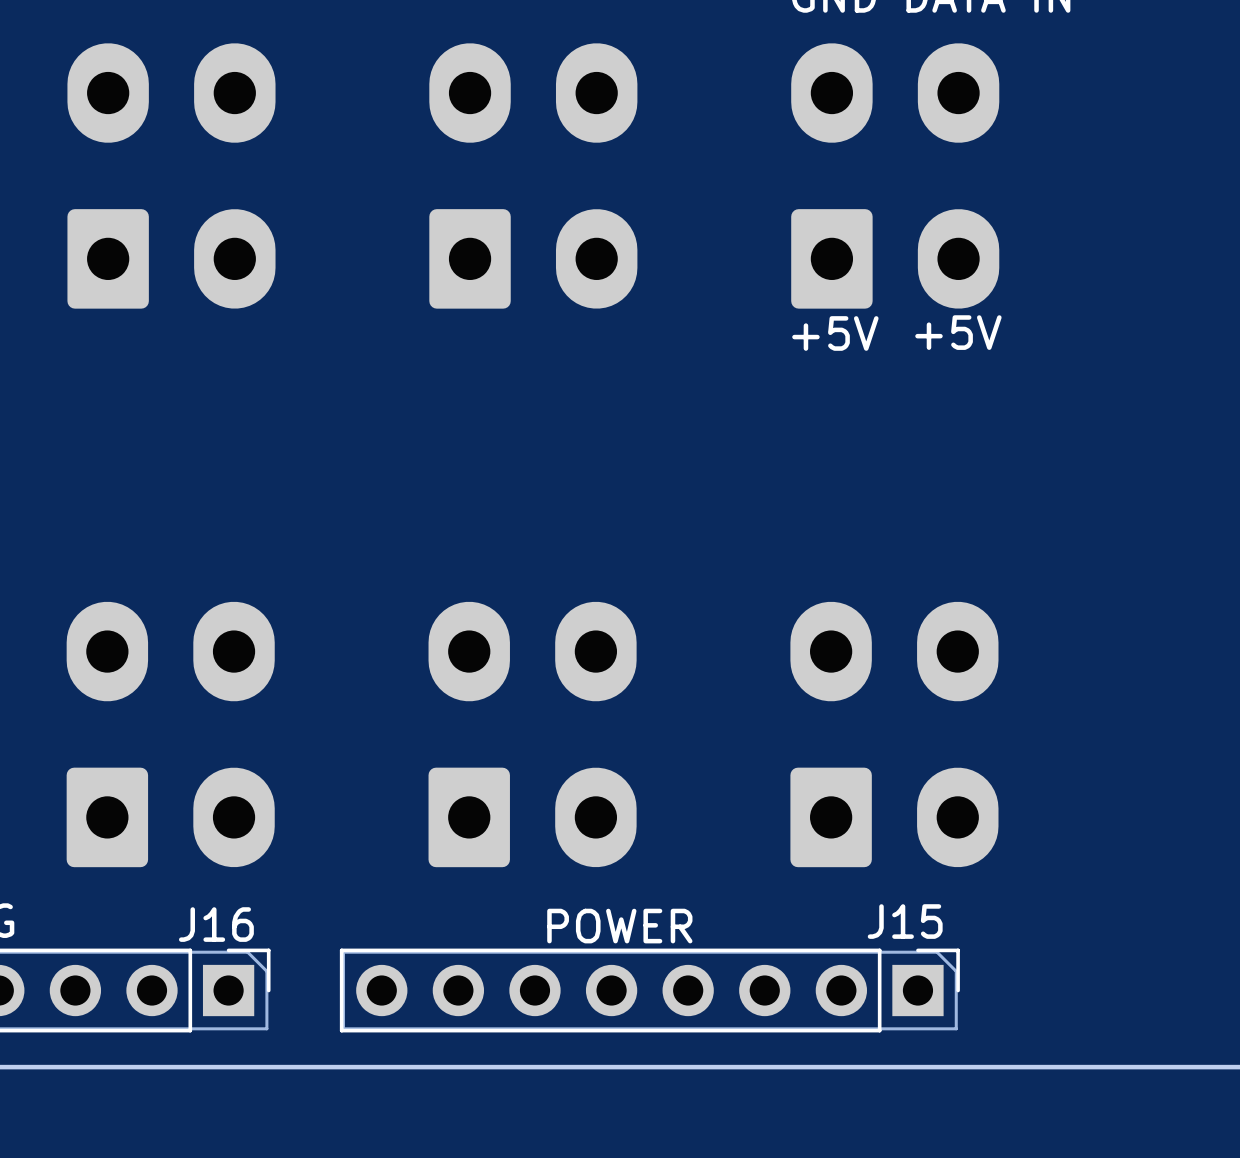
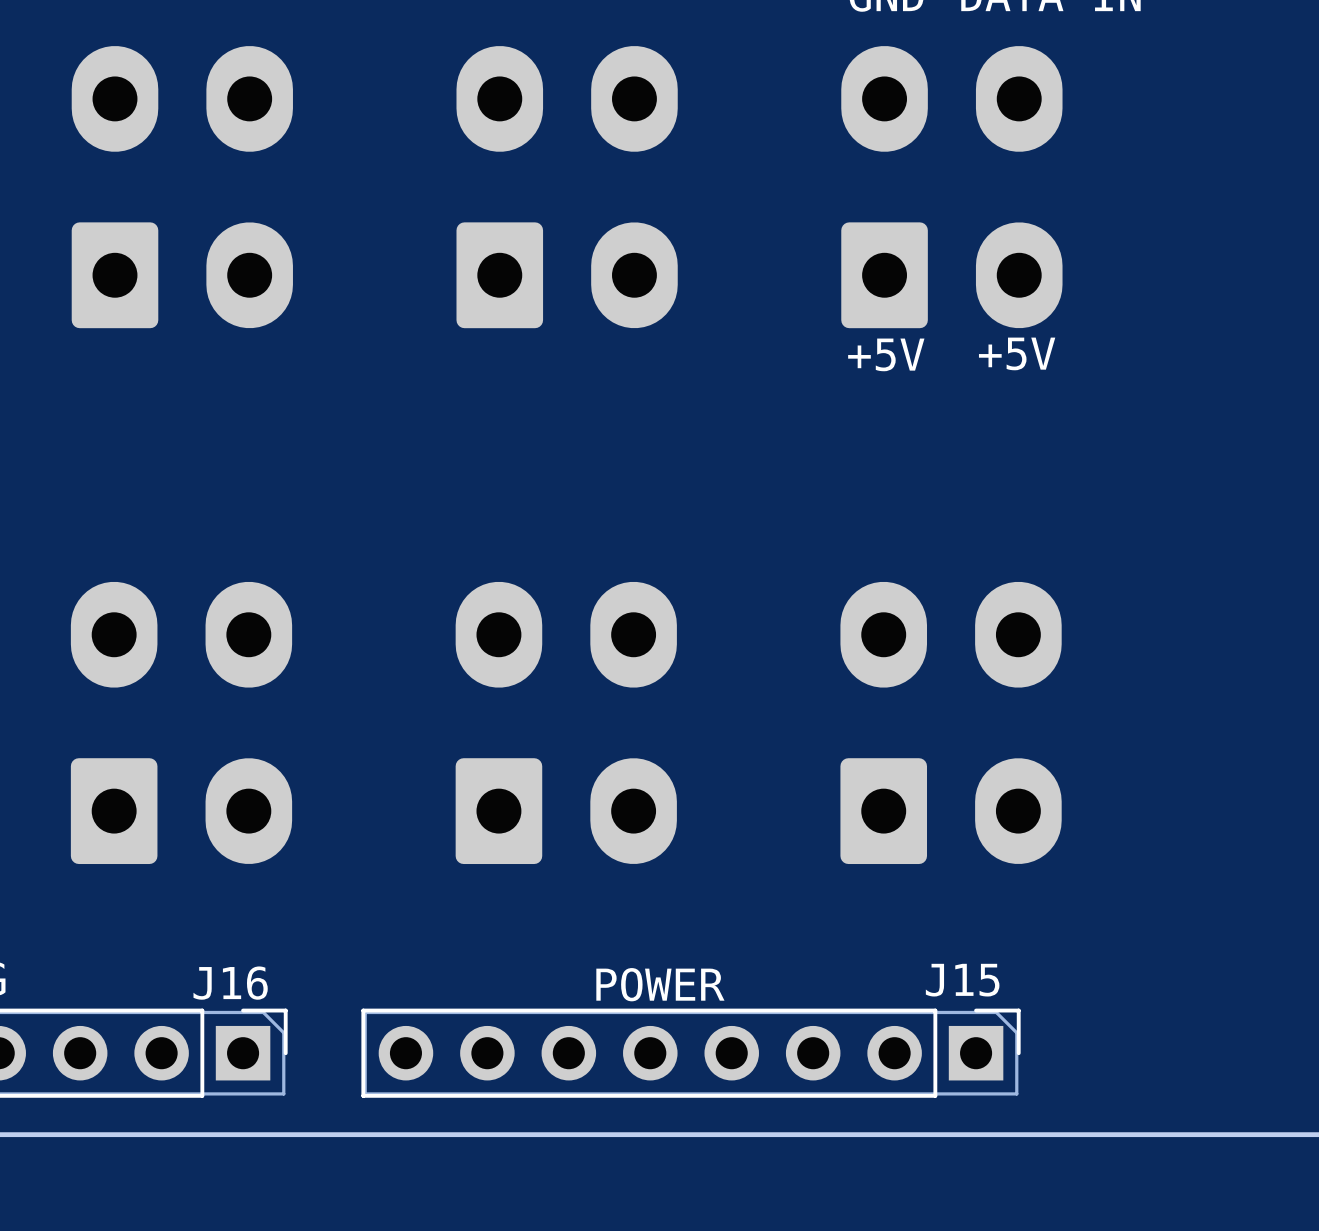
part position: (170, 734) -> (181, 722)
part position: (532, 734) -> (566, 722)
part position: (894, 734) -> (951, 722)

